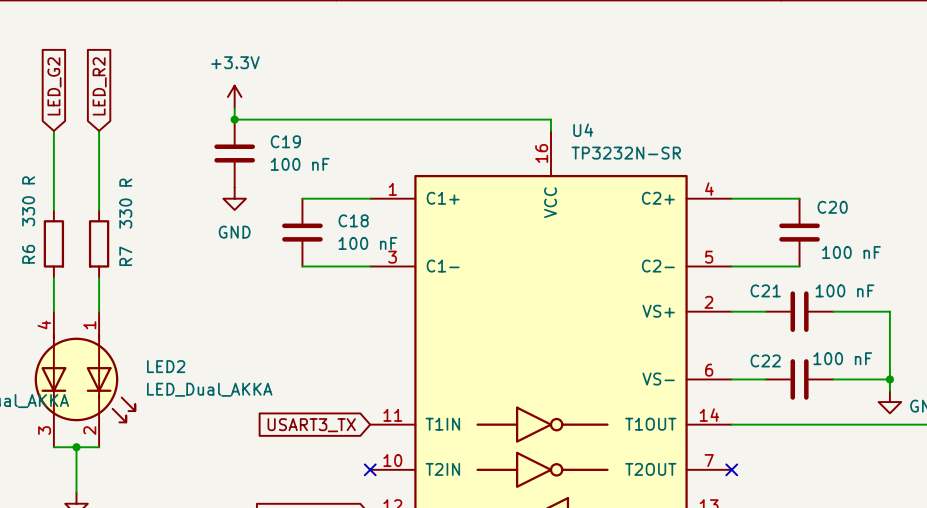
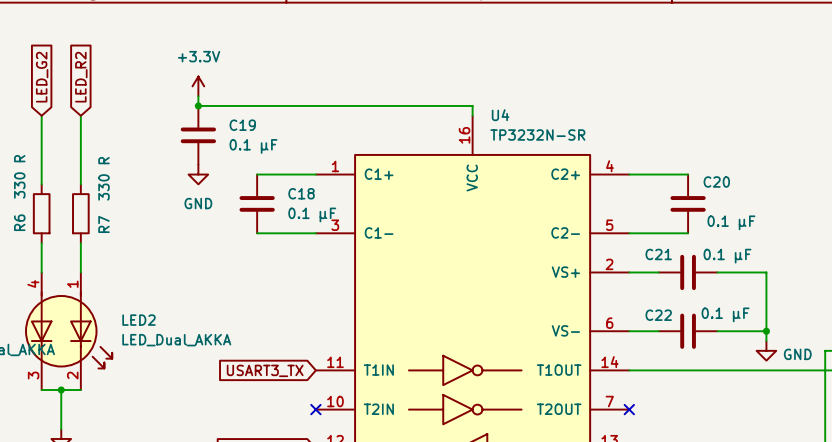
C19 value: 100 nF (300, 164) -> 0.1 µF (253, 146)
C18 value: 100 nF (367, 243) -> 0.1 µF (312, 214)
C20 value: 100 nF (851, 252) -> 0.1 µF (731, 222)
C21 value: 100 nF (845, 290) -> 0.1 µF (727, 256)
C22 value: 100 nF (842, 358) -> 0.1 µF (725, 314)

